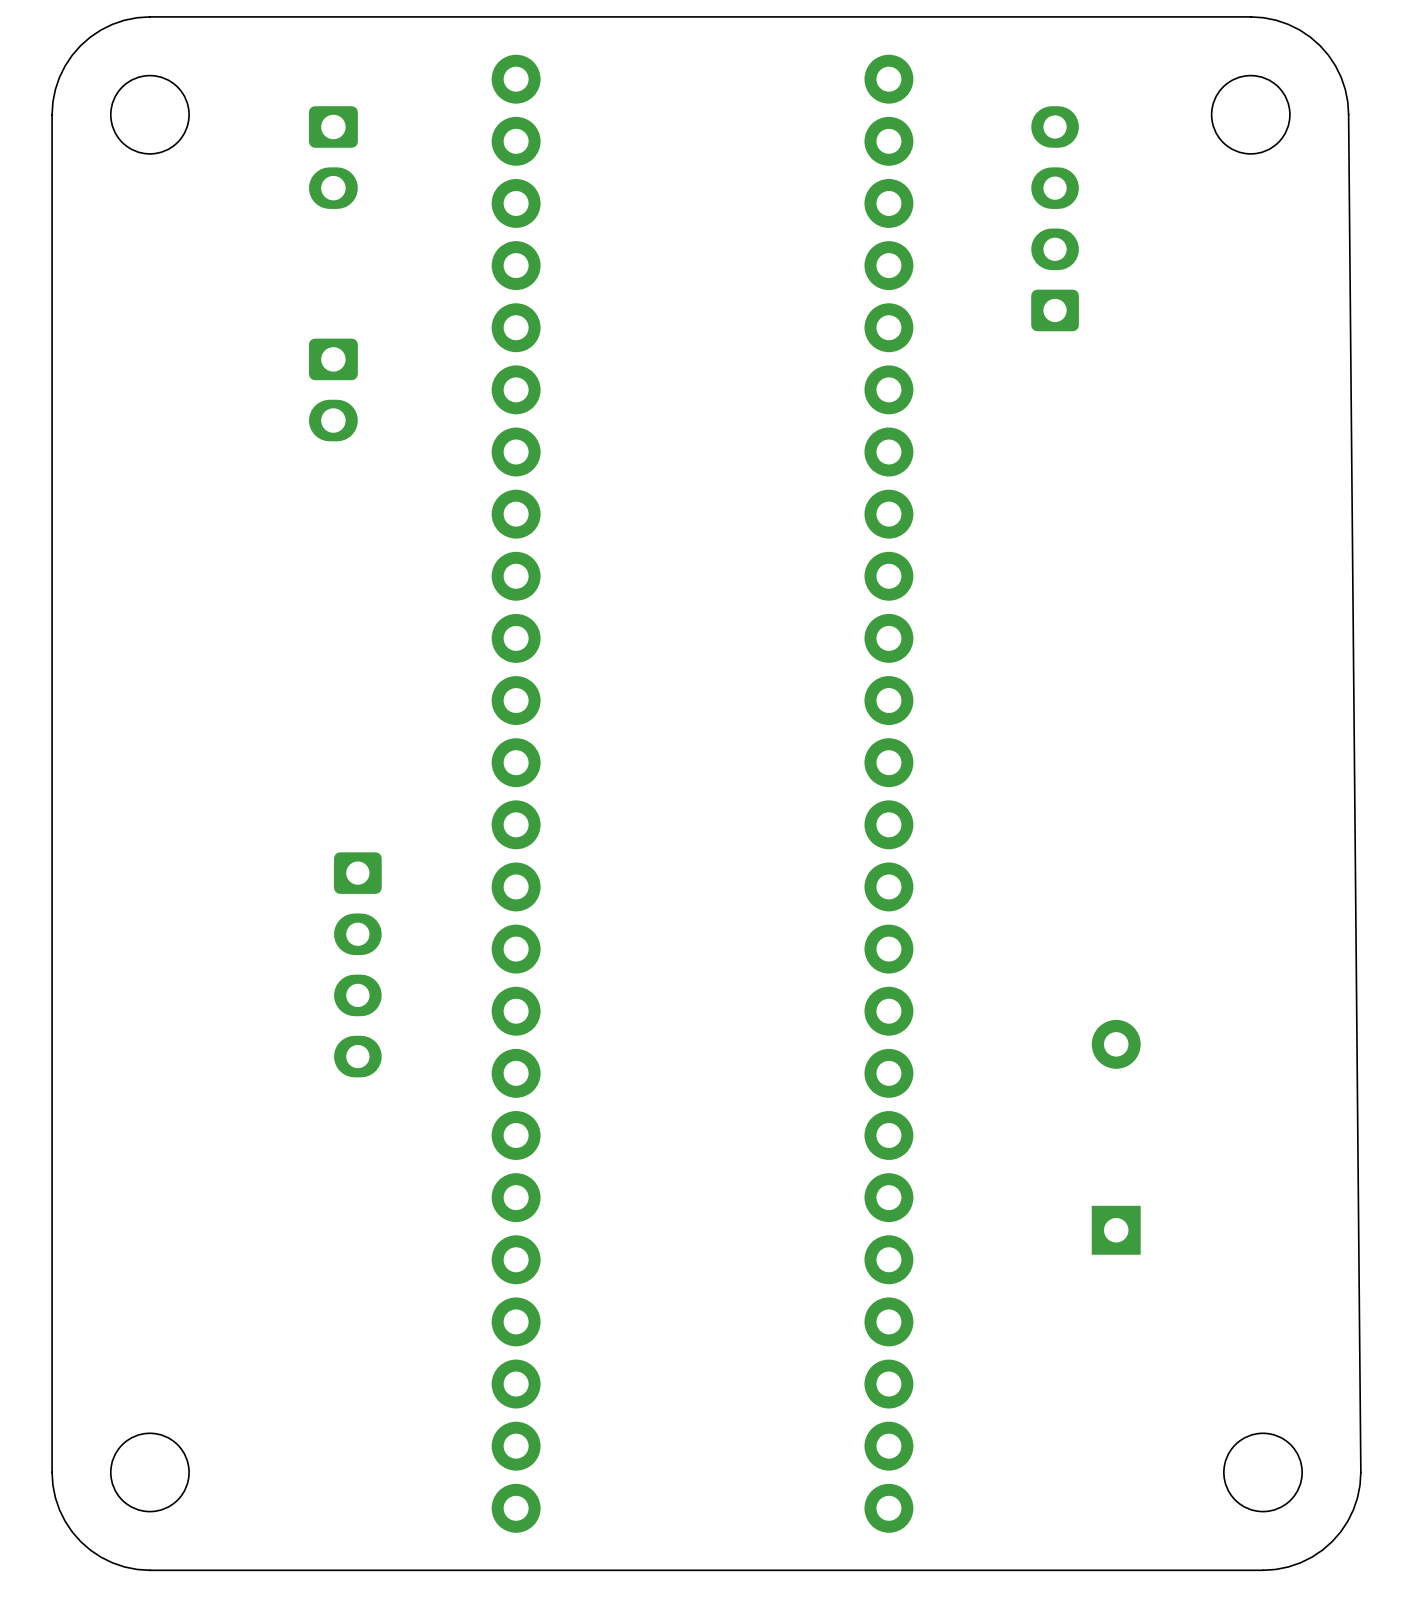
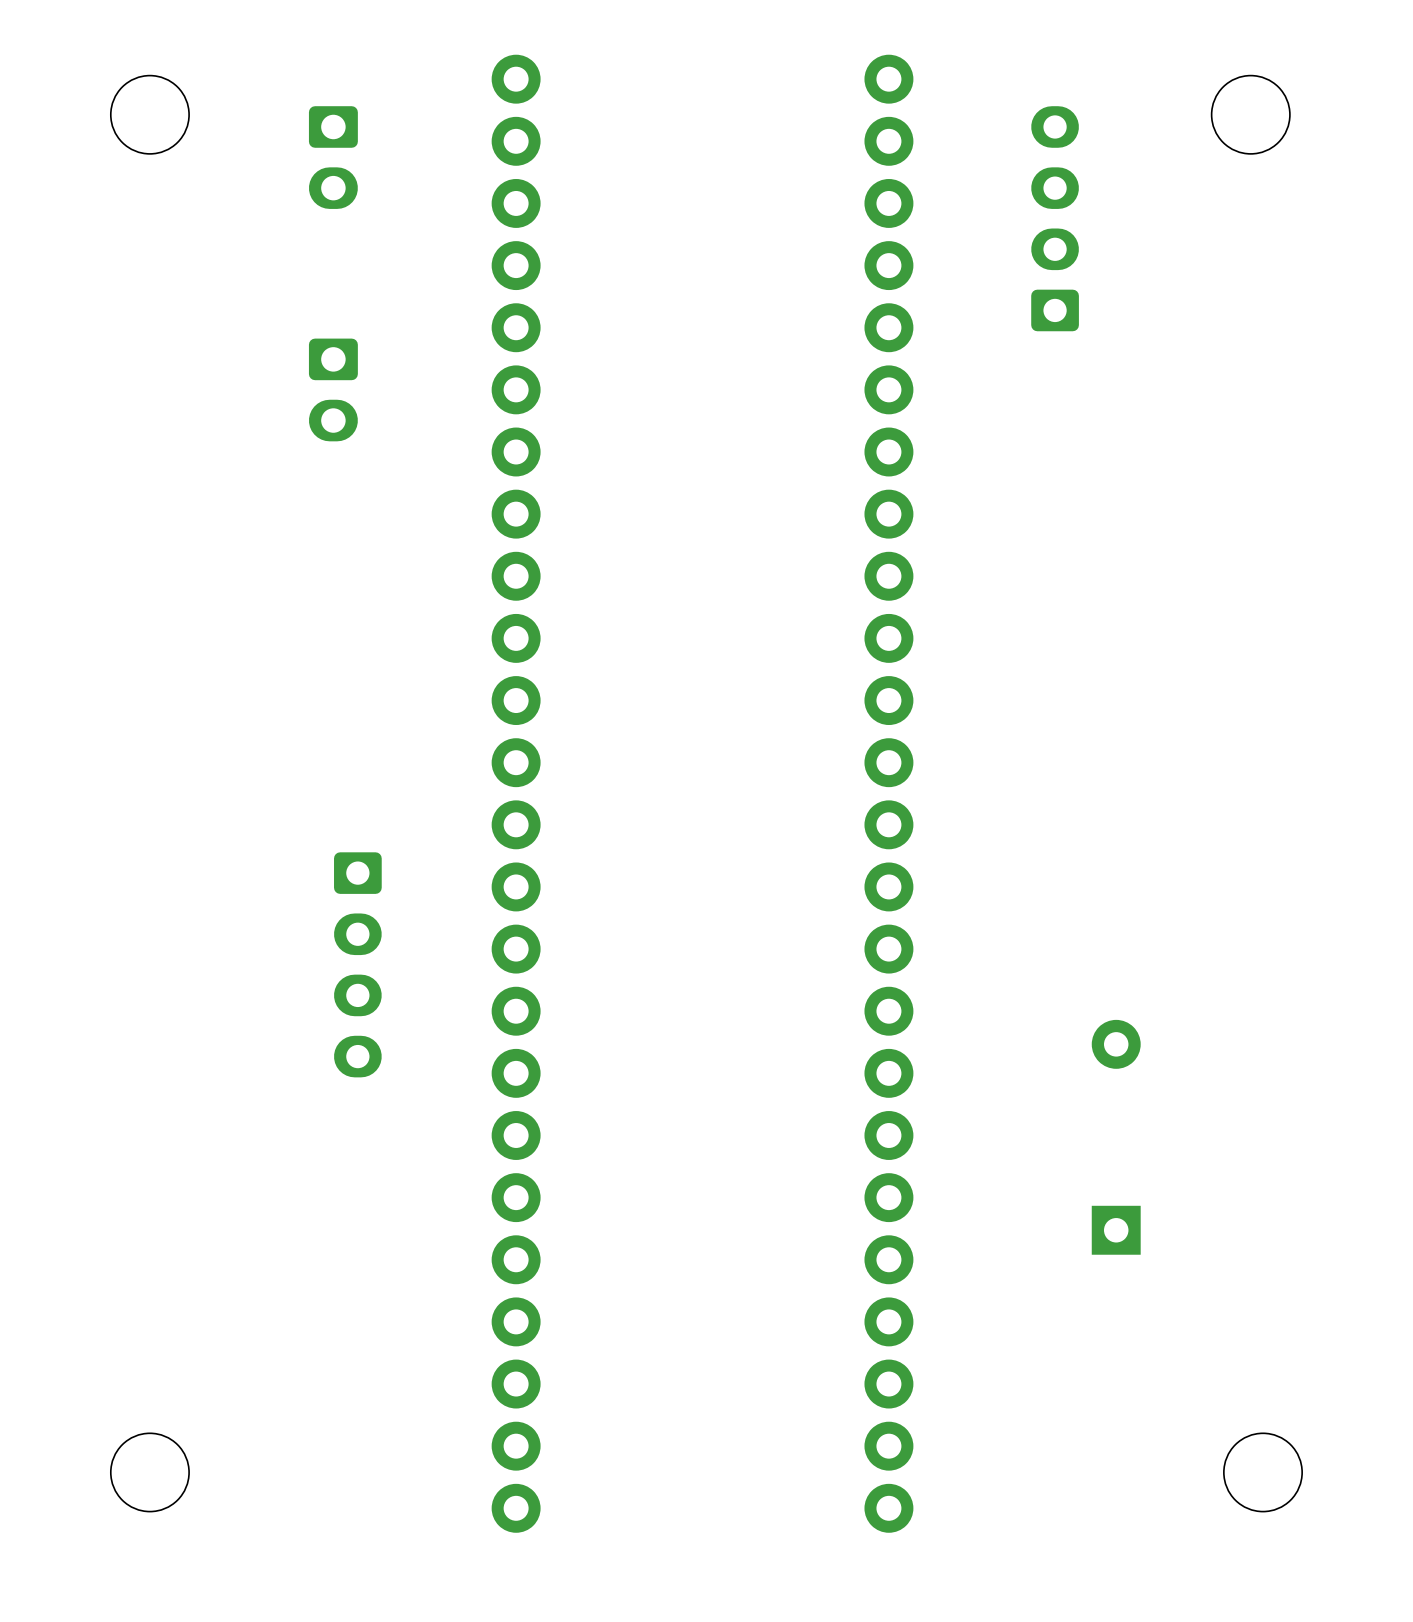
board edge: (1250, 16) (149, 16) (124, 20) (101, 30) (80, 45) (72, 55) (59, 77) (55, 89) (52, 114) (52, 1472) (55, 1497) (59, 1509) (72, 1532) (90, 1550) (112, 1562) (124, 1566) (149, 1570) (1263, 1570) (1288, 1566) (1311, 1557) (1332, 1541) (1340, 1532) (1353, 1509) (1357, 1497) (1360, 1472) (1348, 114) (1345, 89) (1341, 77) (1328, 55) (1319, 45) (1299, 30) (1288, 24) (1263, 17) (1250, 16) -> none

